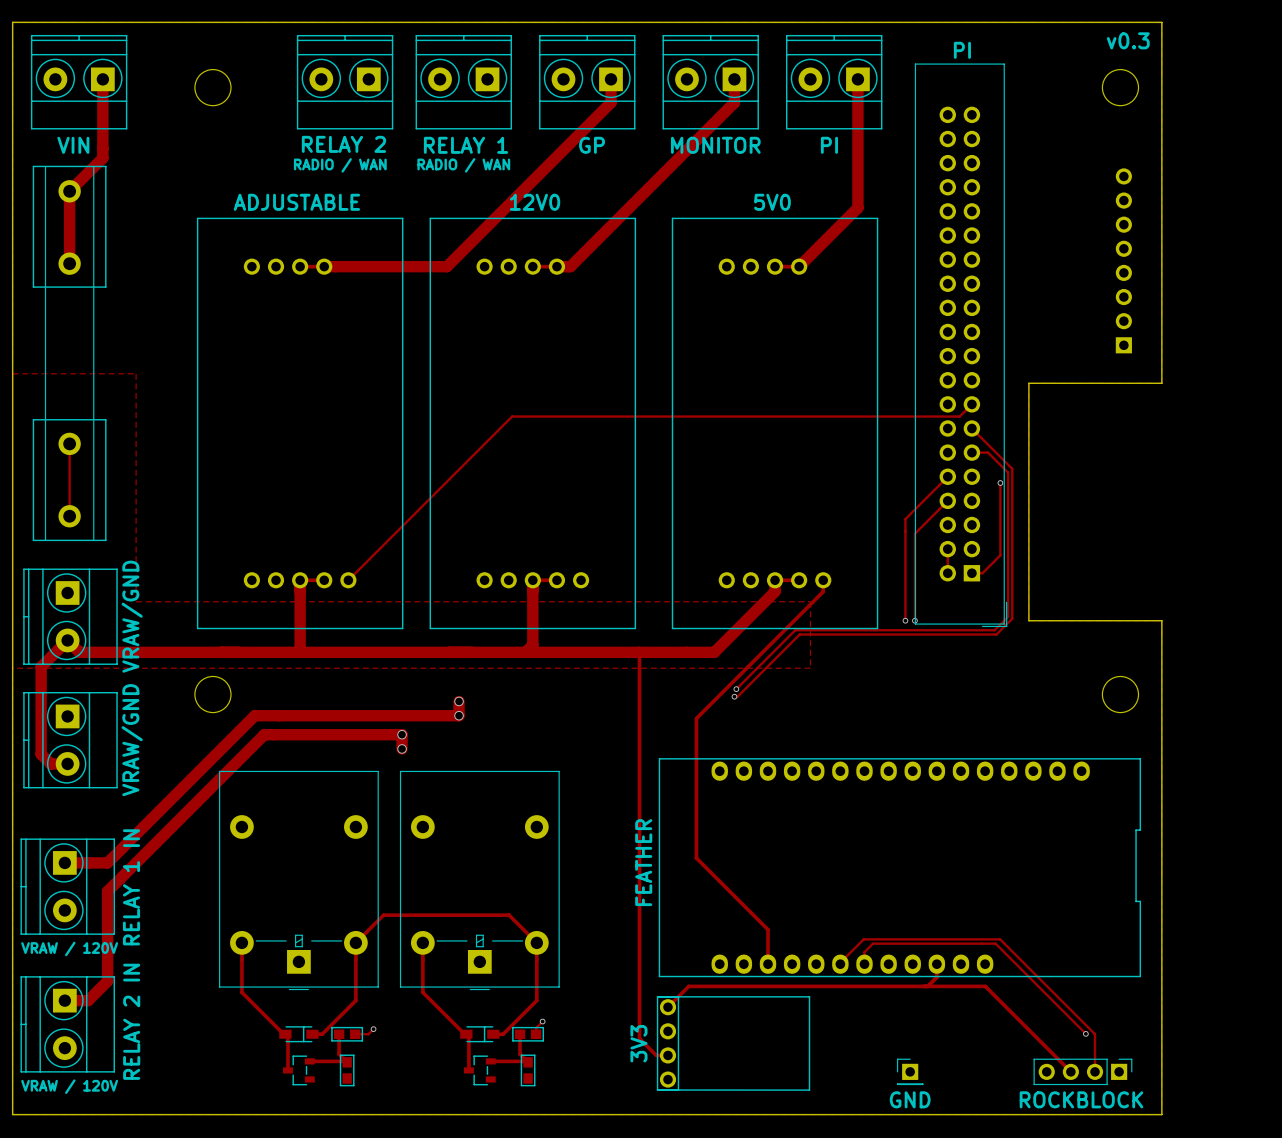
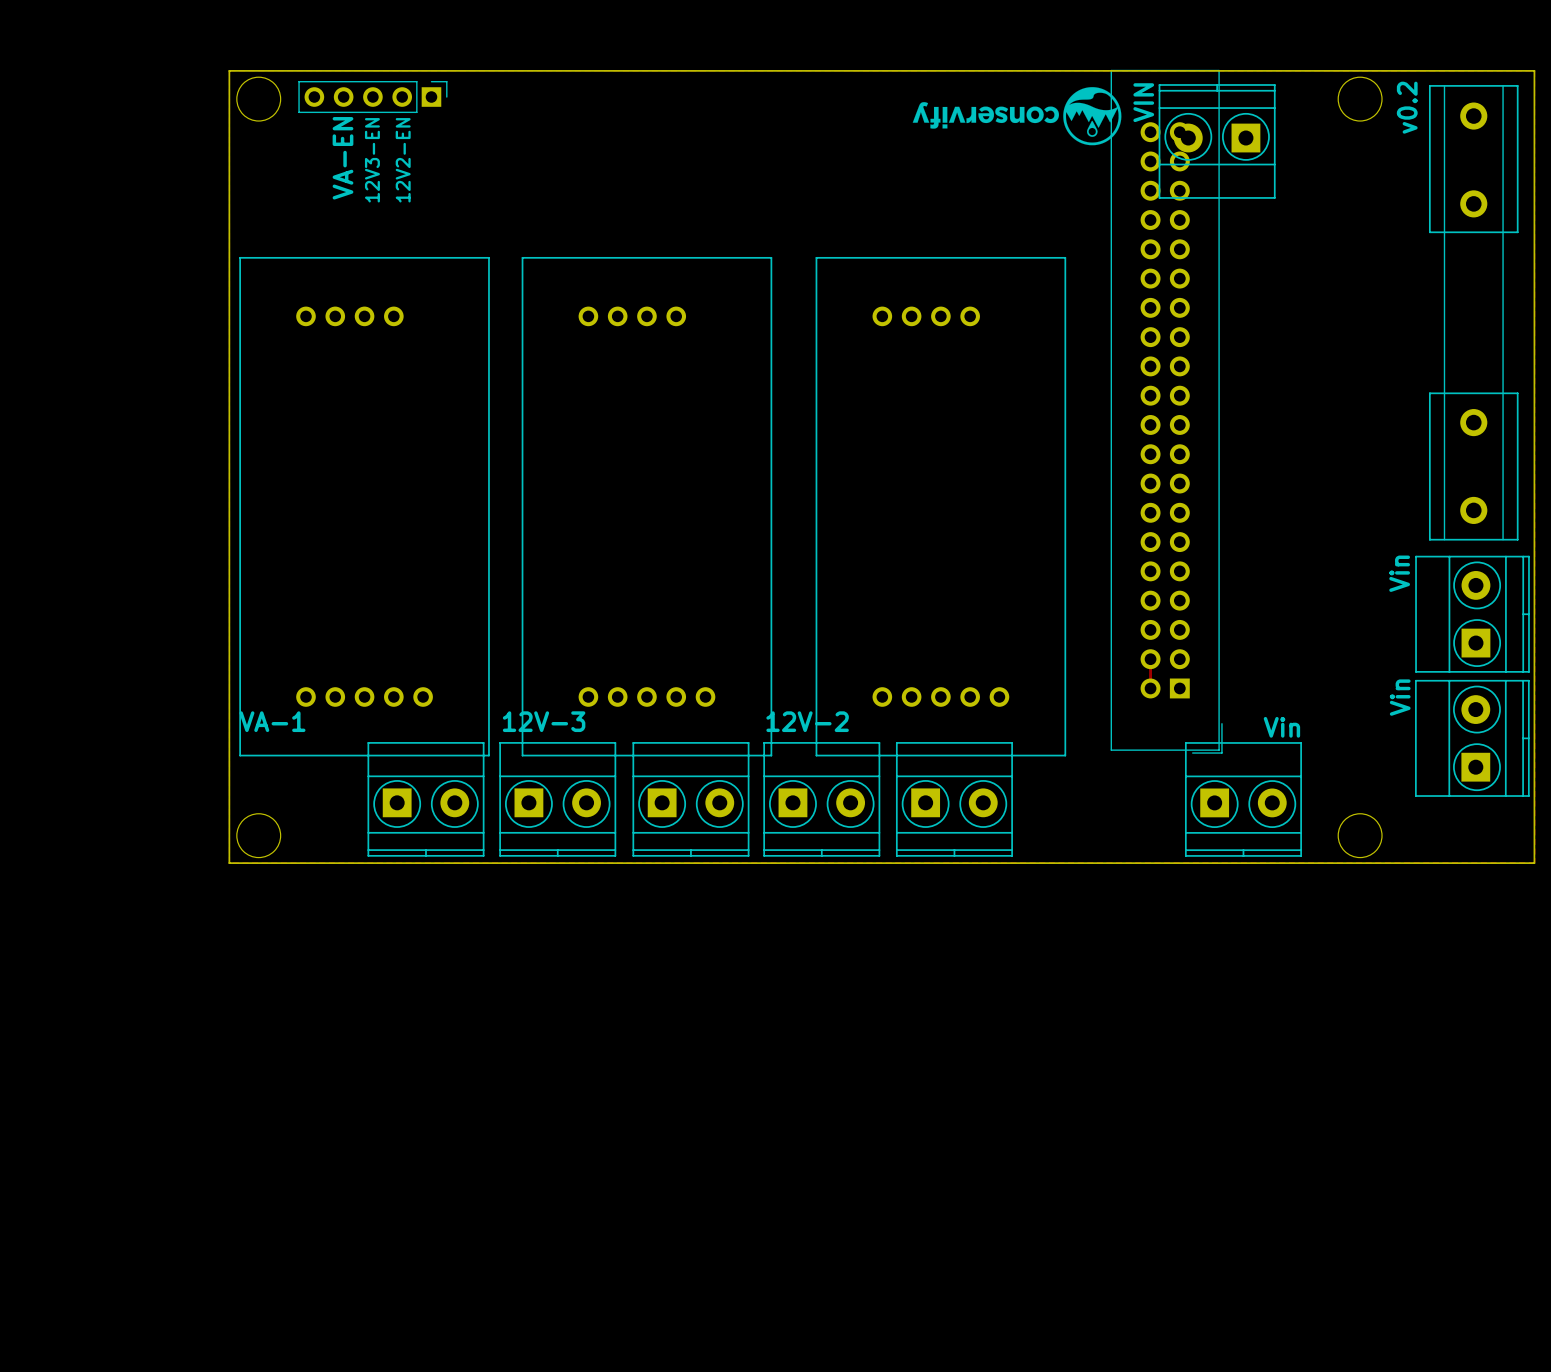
board edge: (12, 22) (1161, 22) (1161, 383) (1028, 383) (1028, 620) (1161, 620) (1161, 1114) (12, 1114) (12, 22) -> none
text: v0.3 (1128, 40) -> none
text: PI (962, 50) -> none
board edge: none -> (229, 70) (1534, 70) (1534, 863) (229, 863) (229, 70)
drawing: none -> [912, 87, 1122, 146]
track: (102, 79) (102, 158) (69, 191) (69, 263) -> none
track: (611, 79) (611, 102) (446, 266) (300, 266) -> none
track: (734, 79) (734, 102) (570, 266) (532, 266) -> none
track: (857, 79) (857, 207) (799, 266) (775, 266) -> none
part: (79, 82) -> none
part: (345, 82) -> none
part: (463, 82) -> none
part: (587, 82) -> none
part: (710, 82) -> none
part: (834, 82) -> none
part: none -> (372, 97)
text: none -> VIN (1143, 102)
text: none -> v0.2 (1407, 107)
part: none -> (1217, 141)
text: none -> VA-EN (342, 158)
text: none -> 12V3-EN (372, 160)
text: none -> 12V2-EN (403, 160)
text: RELAY 2 (343, 144) -> none
text: VIN (73, 145) -> none
text: RELAY 1 (466, 145) -> none
text: GP (592, 145) -> none
text: MONITOR (715, 145) -> none
text: PI (829, 145) -> none
text: RADIO / WAN (340, 165) -> none
text: RADIO / WAN (463, 165) -> none
text: ADJUSTABLE (296, 202) -> none
text: 12V0 (535, 202) -> none
text: 5V0 (772, 202) -> none
part: (1123, 260) -> none
part: none -> (1473, 312)
part: (69, 353) -> none
zone outline: (12, 373) (136, 373) (136, 601) (810, 601) (810, 668) (12, 668) -> none
track: (971, 404) (959, 416) (512, 416) (348, 580) -> none
track: (971, 428) (1012, 468) (1012, 618) (996, 634) (799, 634) (737, 696) (734, 696) -> none
track: (69, 443) (69, 516) (67, 518) -> none
track: (971, 452) (988, 452) (1008, 472) (1008, 616) (994, 630) (795, 630) (736, 689) -> none
track: (947, 476) (905, 519) (905, 620) -> none
text: none -> Vin (1399, 573)
track: (1000, 483) (1000, 555) (982, 573) (971, 573) -> none
via: (1000, 483) -> none
track: (947, 500) (914, 533) (914, 620) -> none
part: none -> (1472, 614)
track: (324, 580) (300, 580) (300, 649) (297, 652) -> none
track: (556, 580) (532, 580) (532, 645) (525, 652) -> none
track: (799, 580) (775, 580) (775, 591) (714, 652) (79, 652) (67, 640) (41, 666) (41, 754) (50, 763) (67, 763) -> none
track: (823, 580) (823, 591) (696, 718) (696, 858) (768, 929) (768, 964) -> none
text: none -> Vin (1400, 697)
text: none -> VA-1 (272, 721)
text: none -> 12V-3 (544, 721)
text: none -> 12V-2 (807, 721)
text: none -> Vin (1281, 727)
part: none -> (1472, 738)
part: (70, 616) -> none
text: VRAW/GND (132, 616) -> none
via: (905, 620) -> none
via: (914, 620) -> none
track: (639, 652) (639, 1038) (656, 1055) (667, 1055) -> none
part: none -> (425, 799)
part: none -> (557, 799)
part: none -> (690, 799)
part: none -> (821, 799)
part: none -> (954, 799)
part: none -> (1243, 799)
via: (736, 689) -> none
via: (734, 696) -> none
track: (459, 701) (459, 715) (254, 715) (107, 862) (64, 862) -> none
via: (459, 701) -> none
via: (459, 715) -> none
via: (402, 734) -> none
part: (70, 740) -> none
text: VRAW/GND (132, 740) -> none
track: (402, 748) (402, 734) (264, 734) (107, 891) (107, 981) (88, 1000) (64, 1000) -> none
via: (402, 748) -> none
text: FEATHER (643, 862) -> none
part: (899, 867) -> none
part: (298, 880) -> none
part: (479, 880) -> none
part: (67, 886) -> none
text: RELAY 1 IN (131, 887) -> none
track: (241, 942) (241, 992) (287, 1036) (287, 1070) -> none
track: (422, 942) (422, 992) (468, 1036) (468, 1070) -> none
text: VRAW / 120V (69, 948) -> none
track: (840, 964) (863, 939) (1000, 939) (1095, 1034) (1095, 1071) -> none
track: (864, 964) (864, 952) (872, 943) (995, 943) (1085, 1033) -> none
track: (926, 986) (936, 976) (936, 964) (936, 977) (927, 986) -> none
track: (667, 1007) (688, 986) (985, 986) (1070, 1071) -> none
text: RELAY 2 IN (131, 1021) -> none
track: (542, 1021) (536, 1027) (536, 1034) -> none
via: (542, 1021) -> none
part: (67, 1024) -> none
track: (373, 1029) (368, 1034) (355, 1034) -> none
via: (373, 1029) -> none
via: (1085, 1033) -> none
part: (298, 1034) -> none
track: (312, 1034) (322, 1034) (355, 1000) (355, 942) (383, 915) (509, 915) (536, 942) (536, 1000) (503, 1034) (493, 1034) -> none
track: (339, 1034) (339, 1054) (347, 1062) -> none
part: (347, 1034) -> none
part: (479, 1034) -> none
track: (520, 1034) (520, 1054) (528, 1062) -> none
part: (528, 1034) -> none
text: 3V3 (638, 1043) -> none
part: (733, 1043) -> none
track: (309, 1061) (346, 1061) -> none
track: (490, 1061) (527, 1061) -> none
part: (298, 1070) -> none
part: (347, 1070) -> none
part: (479, 1070) -> none
part: (528, 1070) -> none
part: (910, 1071) -> none
part: (1082, 1071) -> none
text: VRAW / 120V (69, 1086) -> none
text: GND (910, 1099) -> none
text: ROCKBLOCK (1081, 1099) -> none

